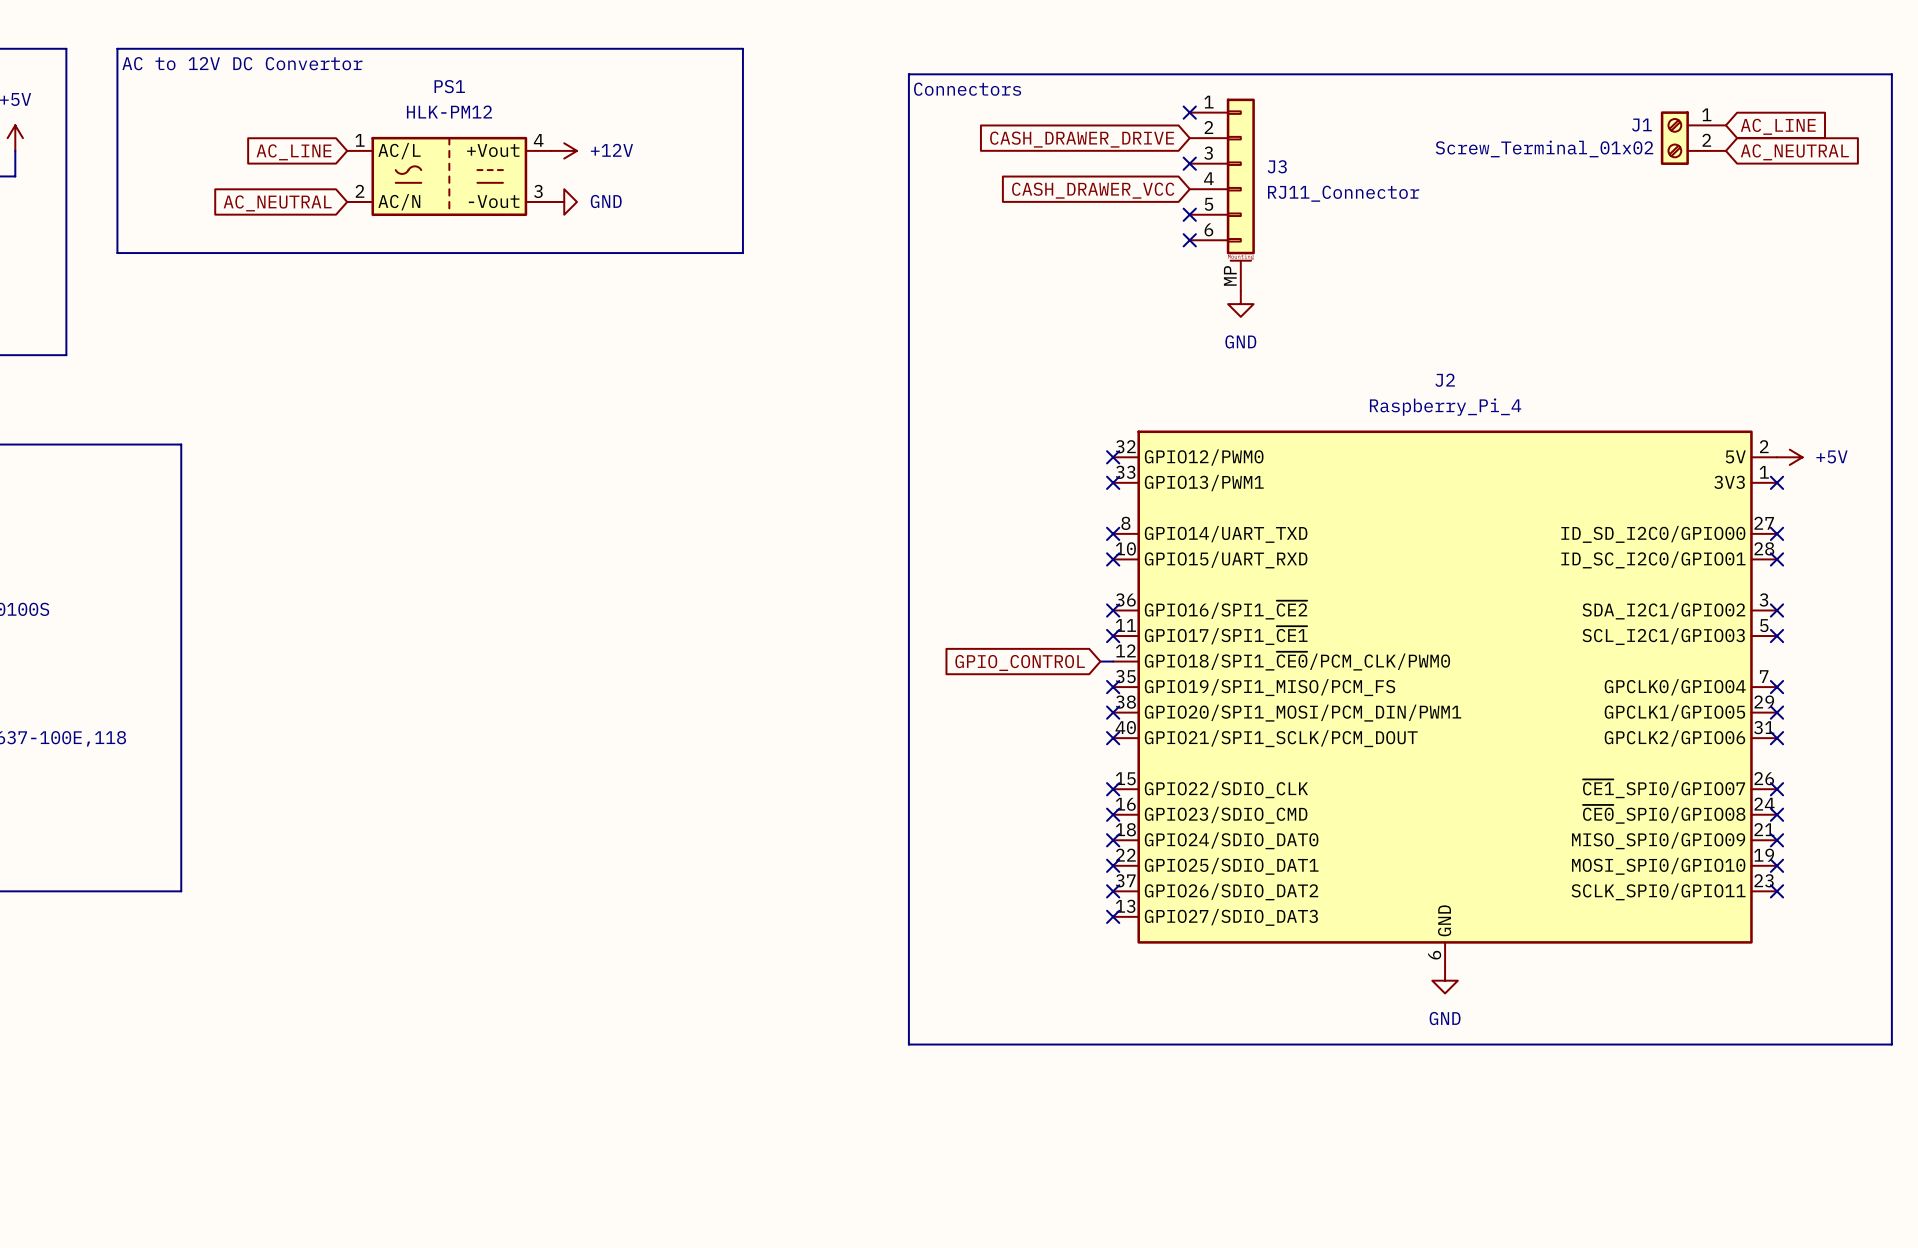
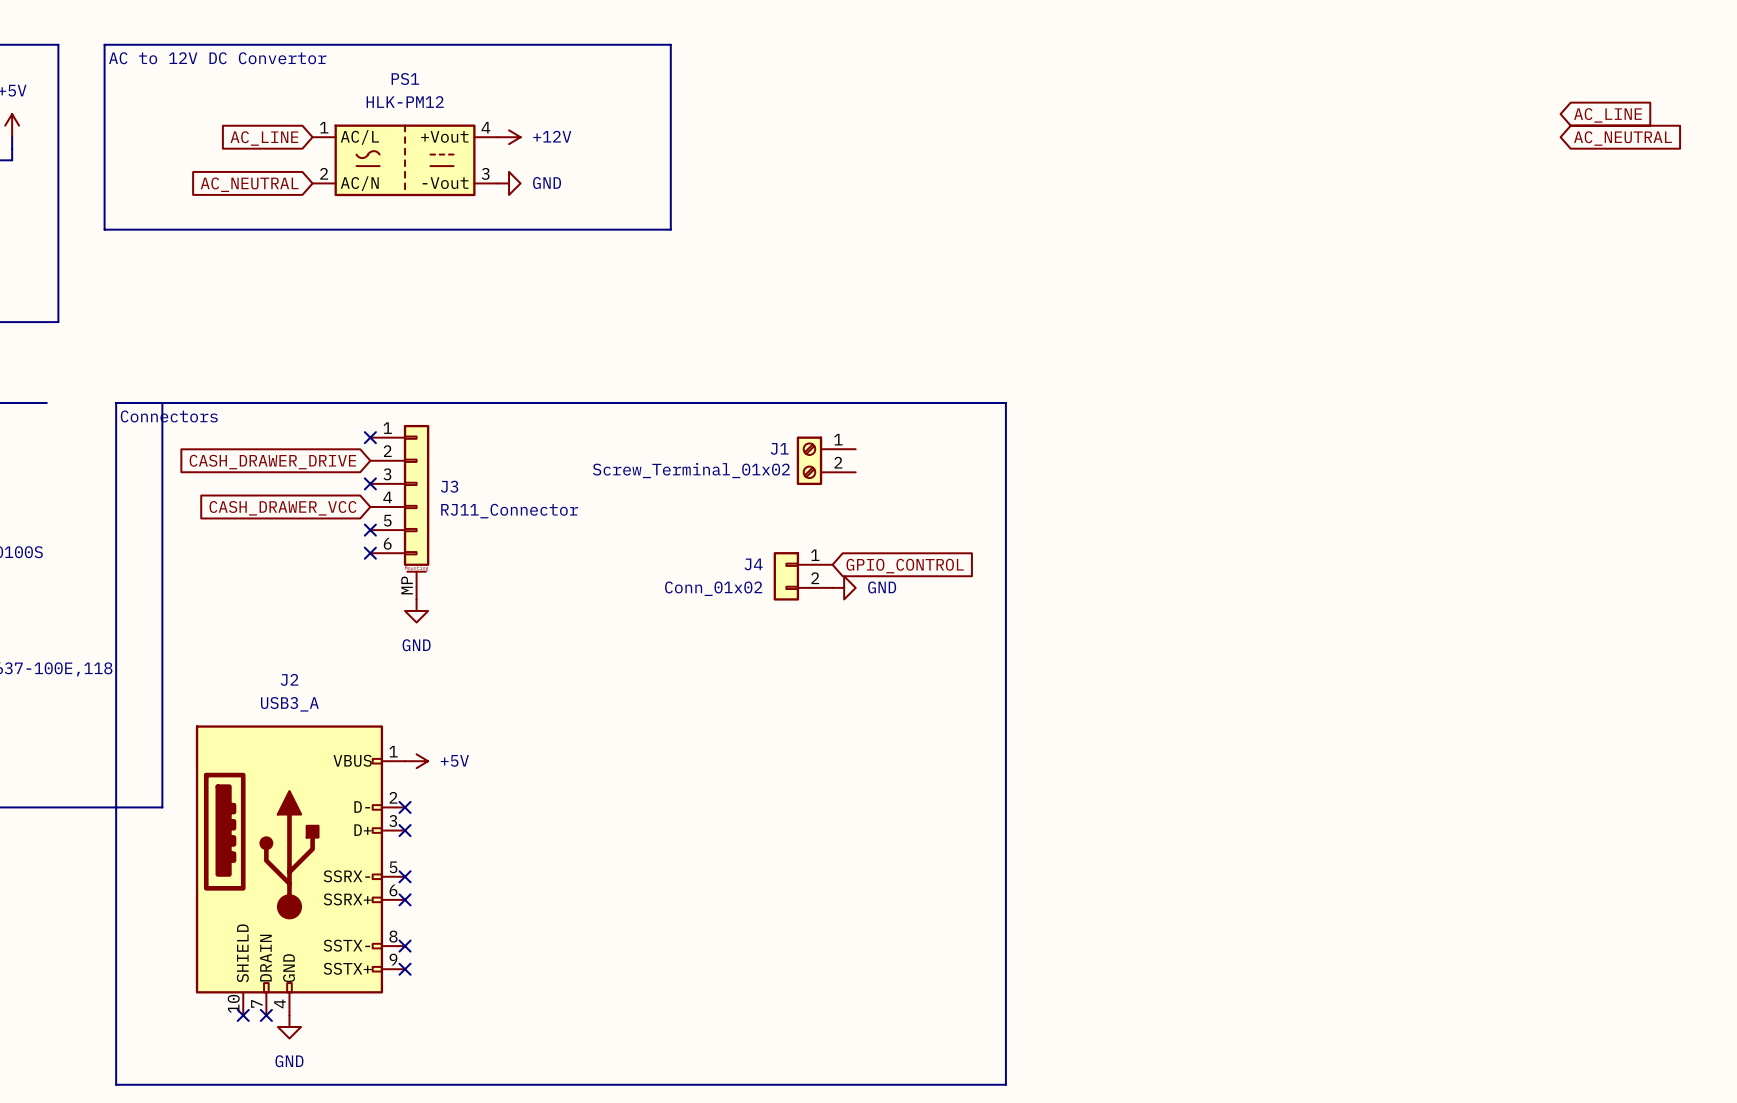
line: (908, 74) (1891, 74) (1891, 1044) (908, 1044) (908, 74) -> none
text: Connectors (967, 89) -> none
no-connect mark: (1189, 112) -> none
J1 position: (1693, 138) -> (826, 460)
global label: CASH_DRAWER_DRIVE (1082, 139) -> none
no-connect mark: (1189, 163) -> none
global label: CASH_DRAWER_VCC (1093, 190) -> none
J3 position: (1222, 194) -> (399, 512)
no-connect mark: (1189, 214) -> none
no-connect mark: (1189, 240) -> none
power symbol: GND (1240, 304) -> none
J2 name position: J2 (1445, 380) -> J2 (289, 679)
J2 value: Raspberry_Pi_4 (1445, 407) -> USB3_A (289, 704)
J2 symbol: [1113, 430, 1777, 968] -> [195, 725, 406, 1016]
line: (53, 444) (130, 444) -> (162, 402) (1005, 402) (1005, 1084) (116, 1084) (116, 402)
no-connect mark: (1113, 457) -> none
power symbol: +5V (1789, 457) -> none
text: none -> Connectors (169, 416)
no-connect mark: none -> (370, 437)
no-connect mark: (1113, 482) -> none
no-connect mark: (1776, 482) -> none
global label: none -> CASH_DRAWER_DRIVE (272, 462)
no-connect mark: none -> (370, 483)
no-connect mark: (1113, 533) -> none
no-connect mark: (1776, 533) -> none
no-connect mark: (1113, 559) -> none
no-connect mark: (1776, 559) -> none
global label: none -> CASH_DRAWER_VCC (282, 508)
no-connect mark: none -> (370, 530)
no-connect mark: none -> (370, 553)
no-connect mark: (1113, 610) -> none
no-connect mark: (1776, 610) -> none
J4: none -> Conn_01x02 (803, 576)
no-connect mark: (1113, 636) -> none
no-connect mark: (1776, 636) -> none
power symbol: none -> GND (844, 587)
wire: (1100, 661) (1113, 661) -> none
global label rotation: 0° (1020, 662) -> 180° (905, 566)
power symbol: none -> GND (416, 610)
no-connect mark: (1113, 687) -> none
no-connect mark: (1776, 687) -> none
no-connect mark: (1113, 712) -> none
no-connect mark: (1776, 712) -> none
no-connect mark: (1113, 738) -> none
no-connect mark: (1776, 738) -> none
no-connect mark: (1113, 789) -> none
no-connect mark: (1776, 789) -> none
no-connect mark: (1113, 814) -> none
no-connect mark: (1776, 814) -> none
power symbol: none -> +5V (416, 761)
no-connect mark: (1113, 840) -> none
no-connect mark: (1776, 840) -> none
no-connect mark: (1113, 865) -> none
no-connect mark: (1776, 865) -> none
no-connect mark: none -> (405, 807)
no-connect mark: (1113, 891) -> none
no-connect mark: (1776, 891) -> none
no-connect mark: none -> (405, 830)
no-connect mark: (1113, 916) -> none
no-connect mark: none -> (405, 876)
power symbol: GND (1445, 980) -> none
no-connect mark: none -> (405, 899)
no-connect mark: none -> (405, 946)
no-connect mark: none -> (405, 969)
no-connect mark: none -> (243, 1015)
no-connect mark: none -> (266, 1015)
power symbol: none -> GND (289, 1026)

